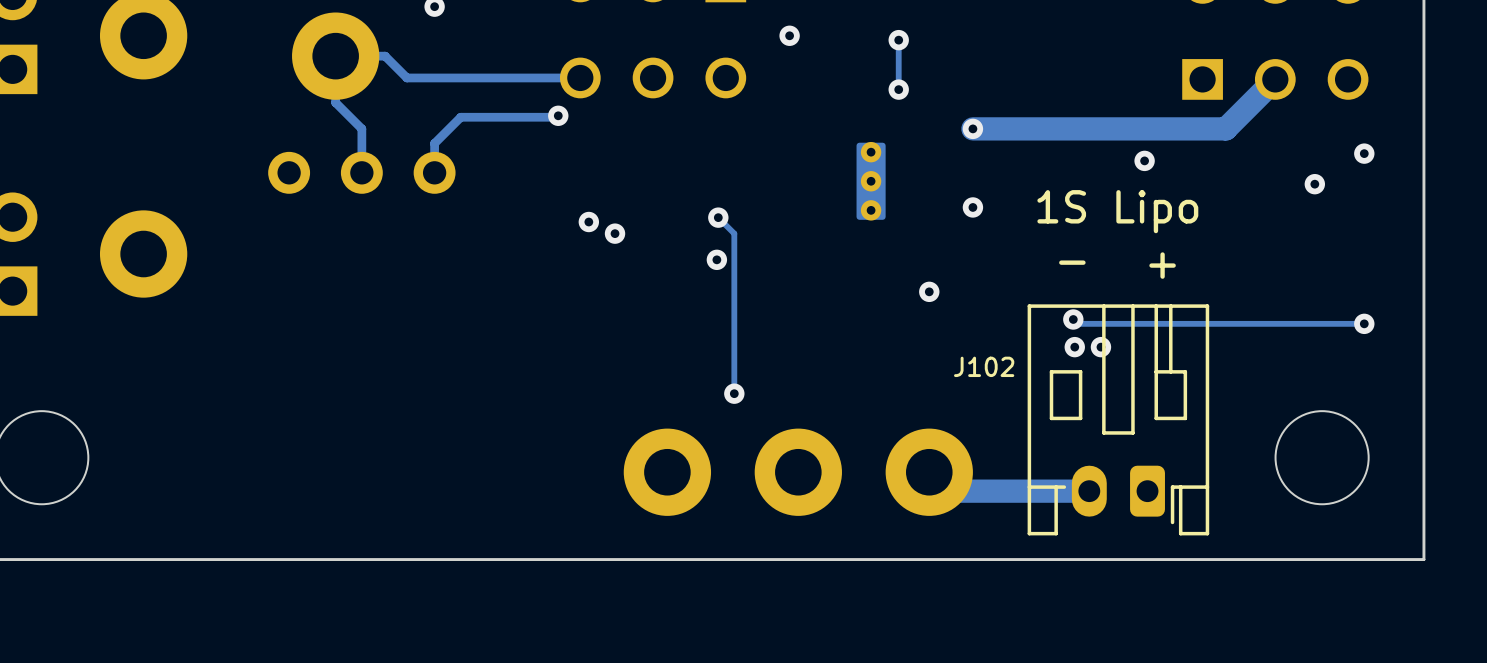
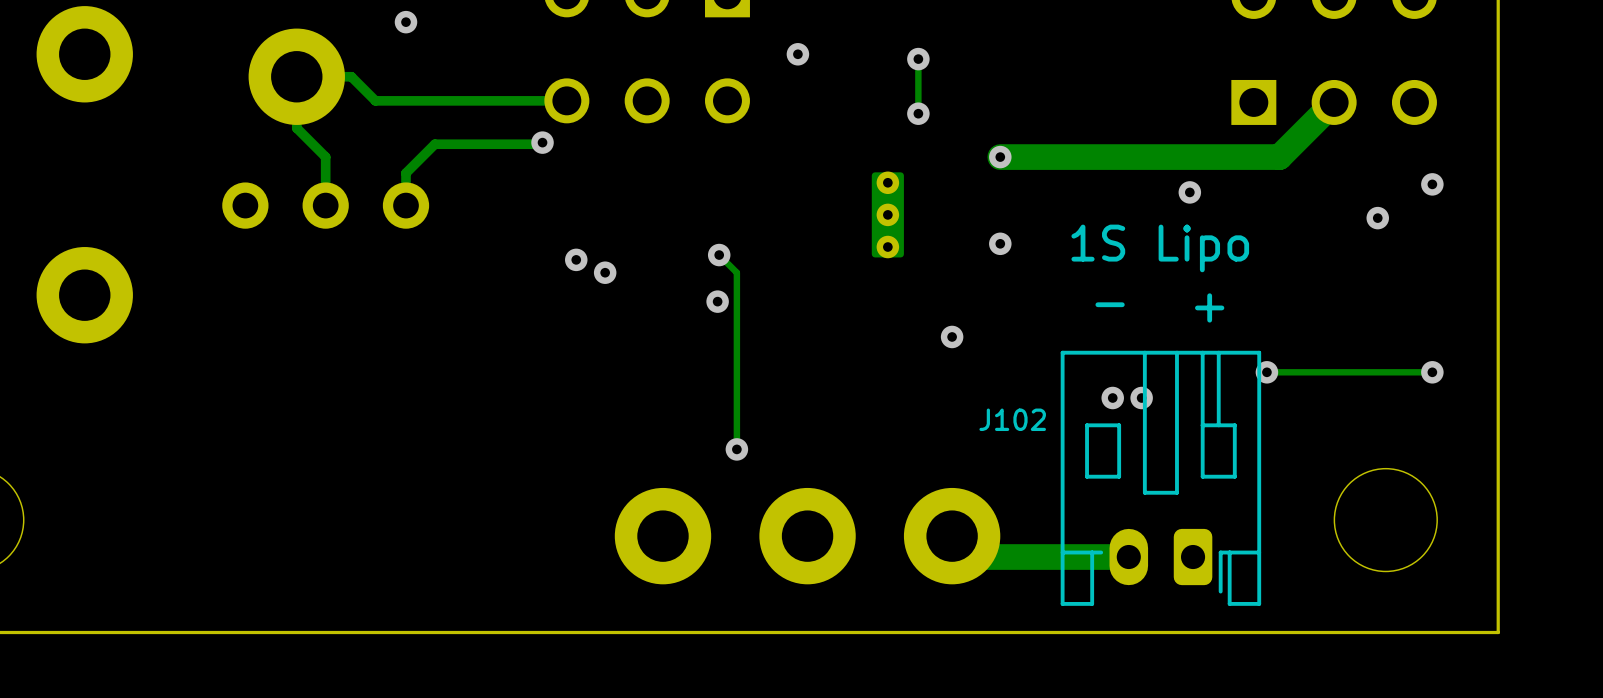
track: (1073, 319) (1077, 323) (1214, 323) -> none
via position: (1073, 319) -> (1266, 372)

